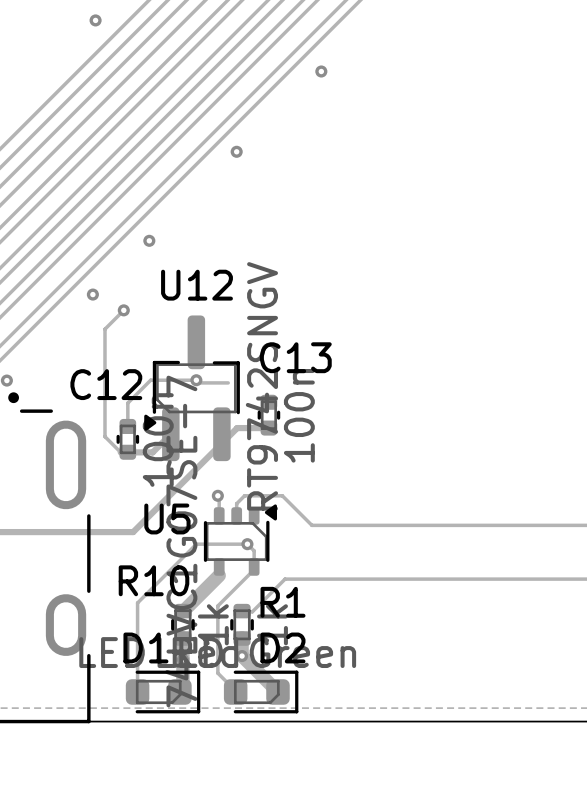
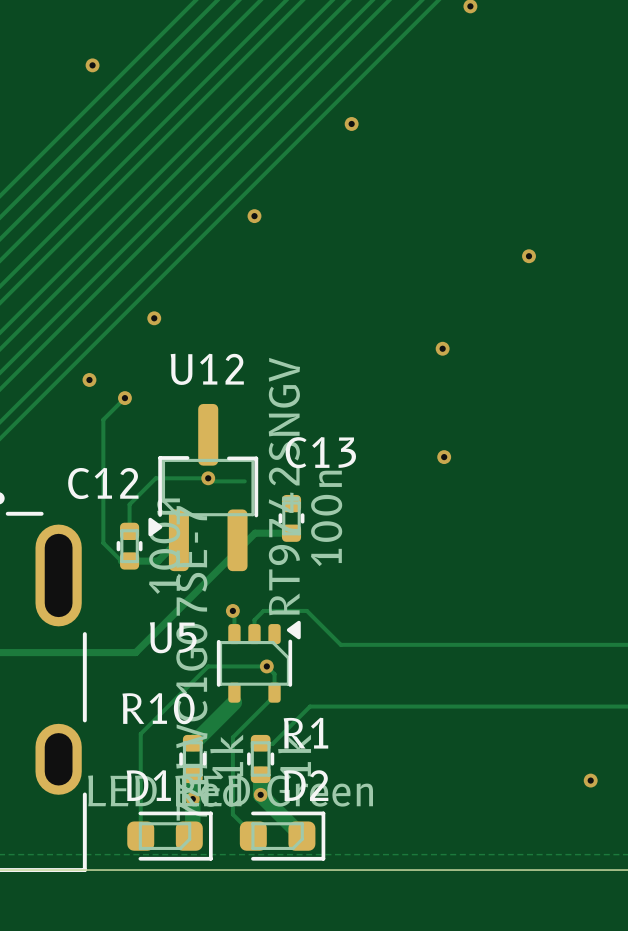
via: none -> (529, 256)
via: none -> (442, 348)
via: none -> (444, 457)
via: none -> (590, 780)

